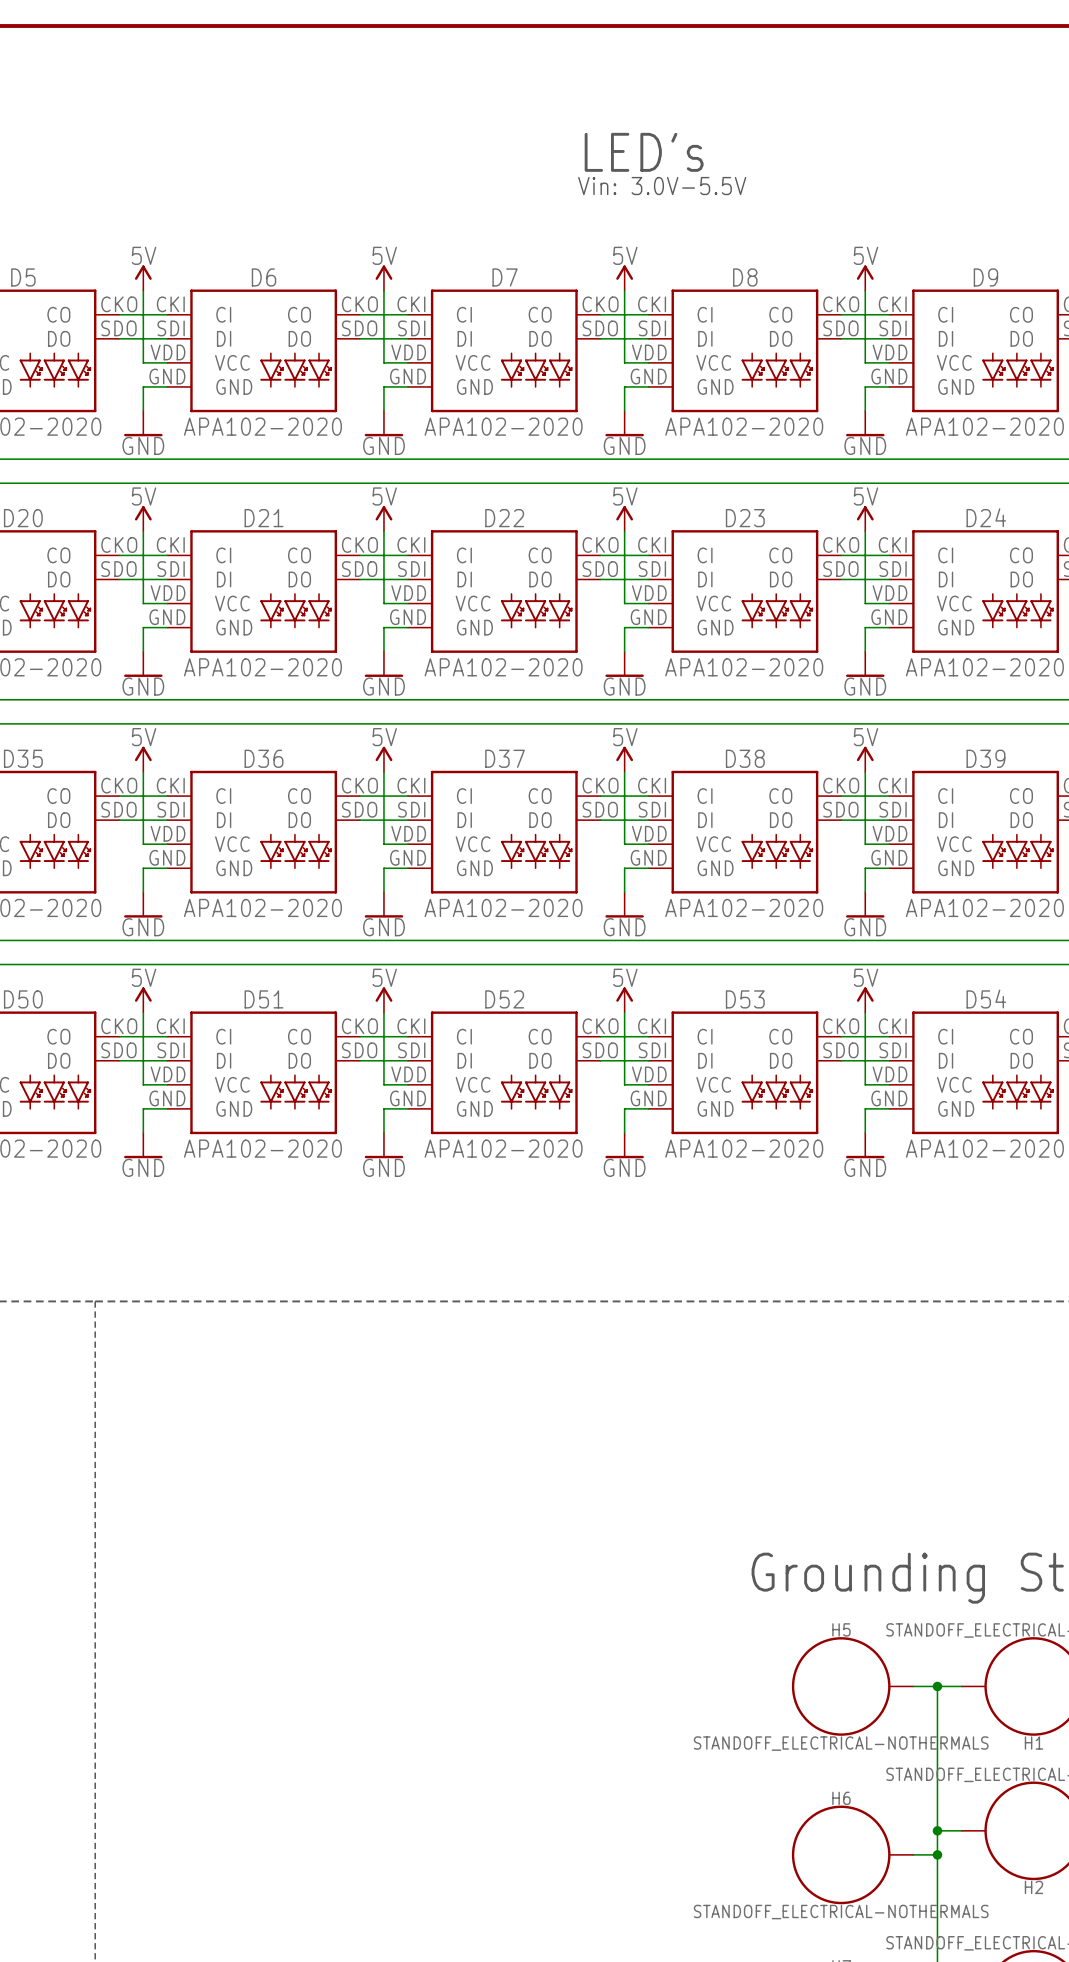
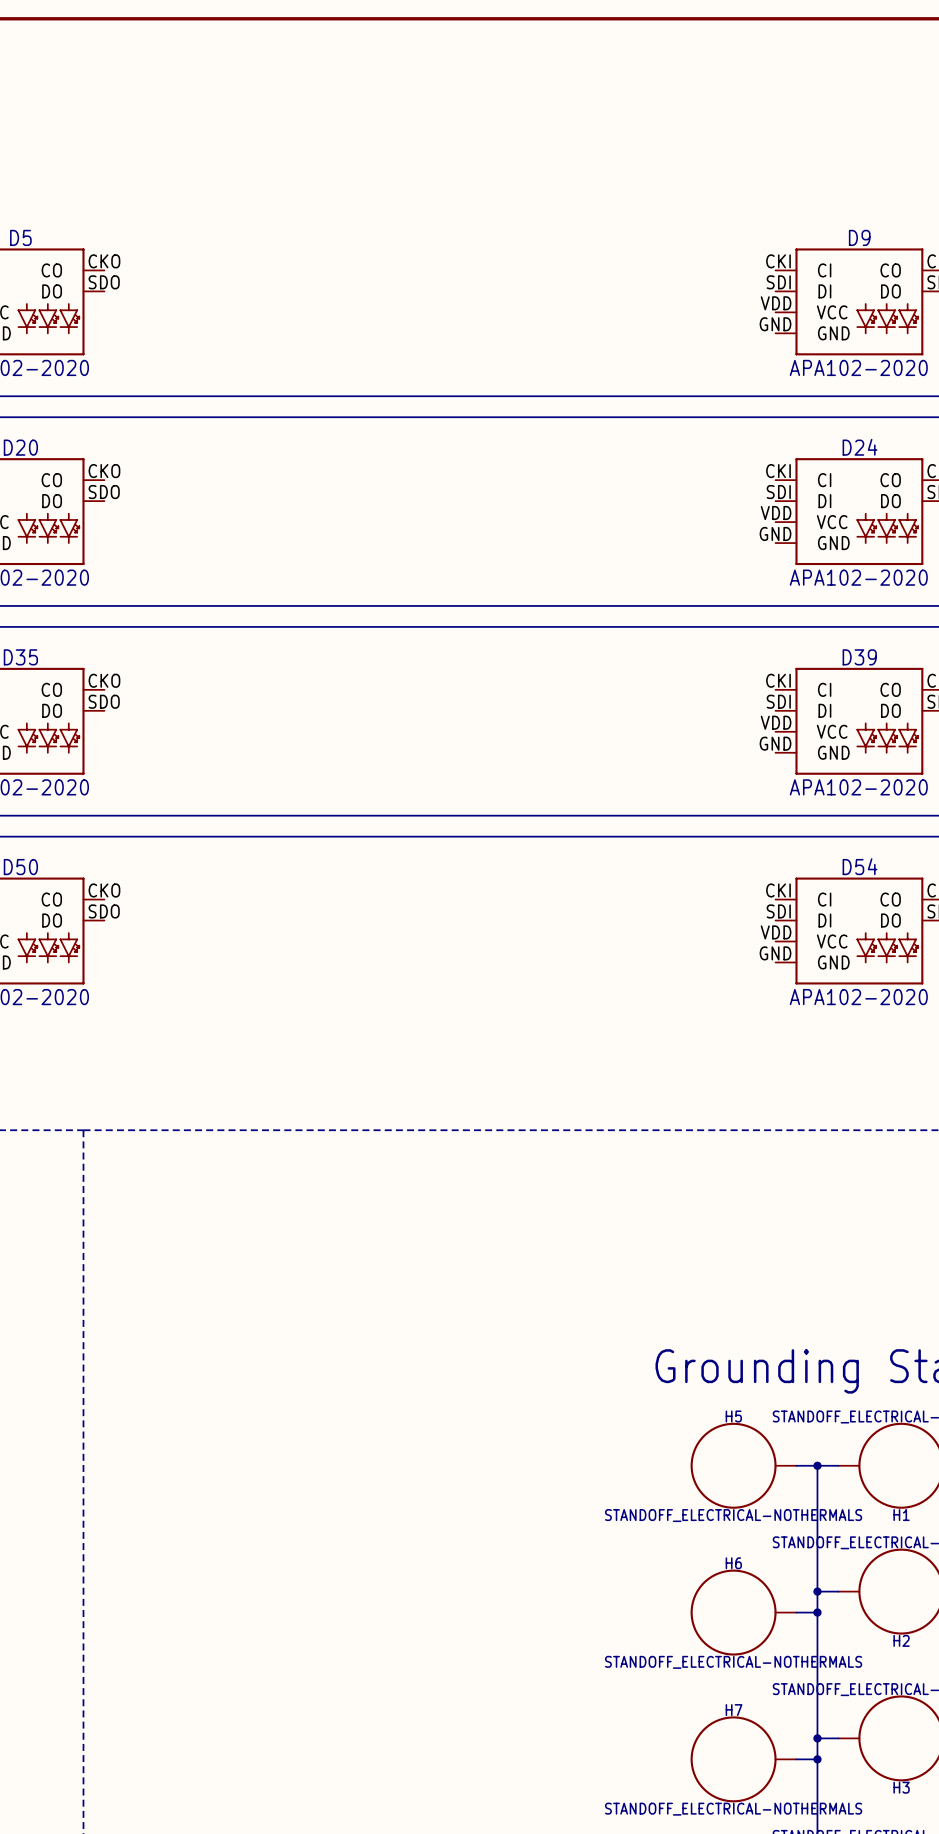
text: LED's (644, 152) -> none
text: Vin: 3.0V-5.5V (662, 186) -> none
power symbol: 5V (143, 278) -> none
power symbol: 5V (383, 278) -> none
power symbol: 5V (624, 278) -> none
power symbol: 5V (865, 278) -> none
wire: (143, 290) (143, 362) (167, 362) -> none
wire: (383, 290) (383, 362) (408, 362) -> none
wire: (624, 290) (624, 362) (648, 362) -> none
wire: (865, 290) (865, 362) (889, 362) -> none
wire: (119, 314) (167, 314) -> none
wire: (359, 314) (408, 314) -> none
wire: (600, 314) (648, 314) -> none
wire: (841, 314) (889, 314) -> none
wire: (119, 338) (167, 338) -> none
wire: (359, 338) (408, 338) -> none
wire: (600, 338) (648, 338) -> none
wire: (841, 338) (889, 338) -> none
D6: APA102-2020 (263, 350) -> none
D7: APA102-2020 (504, 350) -> none
D8: APA102-2020 (744, 350) -> none
wire: (167, 386) (143, 386) (143, 411) -> none
wire: (408, 386) (383, 386) (383, 411) -> none
wire: (648, 386) (624, 386) (624, 411) -> none
wire: (889, 386) (865, 386) (865, 411) -> none
power symbol: GND (143, 423) -> none
power symbol: GND (383, 423) -> none
power symbol: GND (624, 423) -> none
power symbol: GND (865, 423) -> none
power symbol: 5V (143, 518) -> none
power symbol: 5V (383, 518) -> none
power symbol: 5V (624, 518) -> none
power symbol: 5V (865, 518) -> none
wire: (143, 531) (143, 603) (167, 603) -> none
wire: (383, 531) (383, 603) (408, 603) -> none
wire: (624, 531) (624, 603) (648, 603) -> none
wire: (865, 531) (865, 603) (889, 603) -> none
wire: (119, 555) (167, 555) -> none
wire: (359, 555) (408, 555) -> none
wire: (600, 555) (648, 555) -> none
wire: (841, 555) (889, 555) -> none
wire: (119, 579) (167, 579) -> none
wire: (359, 579) (408, 579) -> none
wire: (600, 579) (648, 579) -> none
wire: (841, 579) (889, 579) -> none
D21: APA102-2020 (263, 591) -> none
D22: APA102-2020 (504, 591) -> none
D23: APA102-2020 (744, 591) -> none
wire: (167, 627) (143, 627) (143, 651) -> none
wire: (408, 627) (383, 627) (383, 651) -> none
wire: (648, 627) (624, 627) (624, 651) -> none
wire: (889, 627) (865, 627) (865, 651) -> none
power symbol: GND (143, 664) -> none
power symbol: GND (383, 664) -> none
power symbol: GND (624, 664) -> none
power symbol: GND (865, 664) -> none
power symbol: 5V (143, 759) -> none
power symbol: 5V (383, 759) -> none
power symbol: 5V (624, 759) -> none
power symbol: 5V (865, 759) -> none
wire: (143, 772) (143, 844) (167, 844) -> none
wire: (383, 772) (383, 844) (408, 844) -> none
wire: (624, 772) (624, 844) (648, 844) -> none
wire: (865, 772) (865, 844) (889, 844) -> none
wire: (119, 796) (167, 796) -> none
wire: (359, 796) (408, 796) -> none
wire: (600, 796) (648, 796) -> none
wire: (841, 796) (889, 796) -> none
wire: (119, 820) (167, 820) -> none
wire: (359, 820) (408, 820) -> none
wire: (600, 820) (648, 820) -> none
wire: (841, 820) (889, 820) -> none
D36: APA102-2020 (263, 832) -> none
D37: APA102-2020 (504, 832) -> none
D38: APA102-2020 (744, 832) -> none
wire: (167, 868) (143, 868) (143, 892) -> none
wire: (408, 868) (383, 868) (383, 892) -> none
wire: (648, 868) (624, 868) (624, 892) -> none
wire: (889, 868) (865, 868) (865, 892) -> none
power symbol: GND (143, 904) -> none
power symbol: GND (383, 904) -> none
power symbol: GND (624, 904) -> none
power symbol: GND (865, 904) -> none
power symbol: 5V (143, 1000) -> none
power symbol: 5V (383, 1000) -> none
power symbol: 5V (624, 1000) -> none
power symbol: 5V (865, 1000) -> none
wire: (143, 1012) (143, 1084) (167, 1084) -> none
wire: (383, 1012) (383, 1084) (408, 1084) -> none
wire: (624, 1012) (624, 1084) (648, 1084) -> none
wire: (865, 1012) (865, 1084) (889, 1084) -> none
wire: (119, 1036) (167, 1036) -> none
wire: (359, 1036) (408, 1036) -> none
wire: (600, 1036) (648, 1036) -> none
wire: (841, 1036) (889, 1036) -> none
wire: (119, 1060) (167, 1060) -> none
wire: (359, 1060) (408, 1060) -> none
wire: (600, 1060) (648, 1060) -> none
wire: (841, 1060) (889, 1060) -> none
D51: APA102-2020 (263, 1072) -> none
D52: APA102-2020 (504, 1072) -> none
D53: APA102-2020 (744, 1072) -> none
wire: (167, 1108) (143, 1108) (143, 1132) -> none
wire: (408, 1108) (383, 1108) (383, 1132) -> none
wire: (648, 1108) (624, 1108) (624, 1132) -> none
wire: (889, 1108) (865, 1108) (865, 1132) -> none
power symbol: GND (143, 1145) -> none
power symbol: GND (383, 1145) -> none
power symbol: GND (624, 1145) -> none
power symbol: GND (865, 1145) -> none

